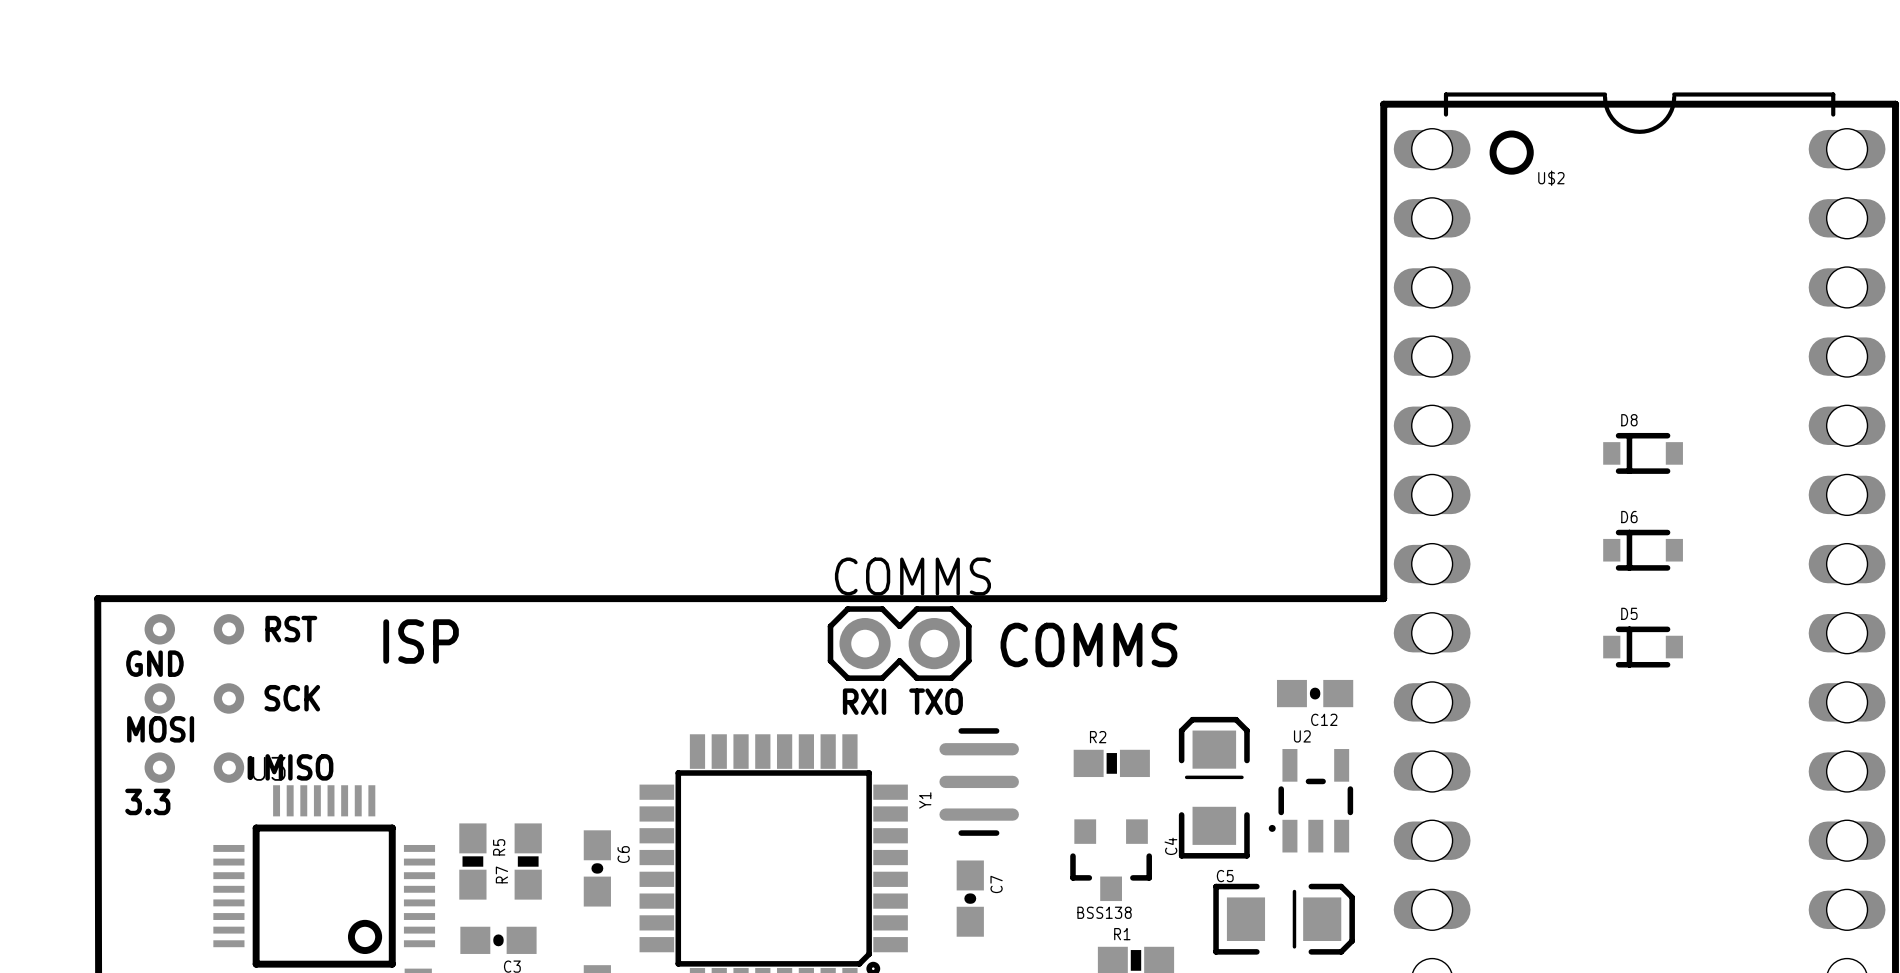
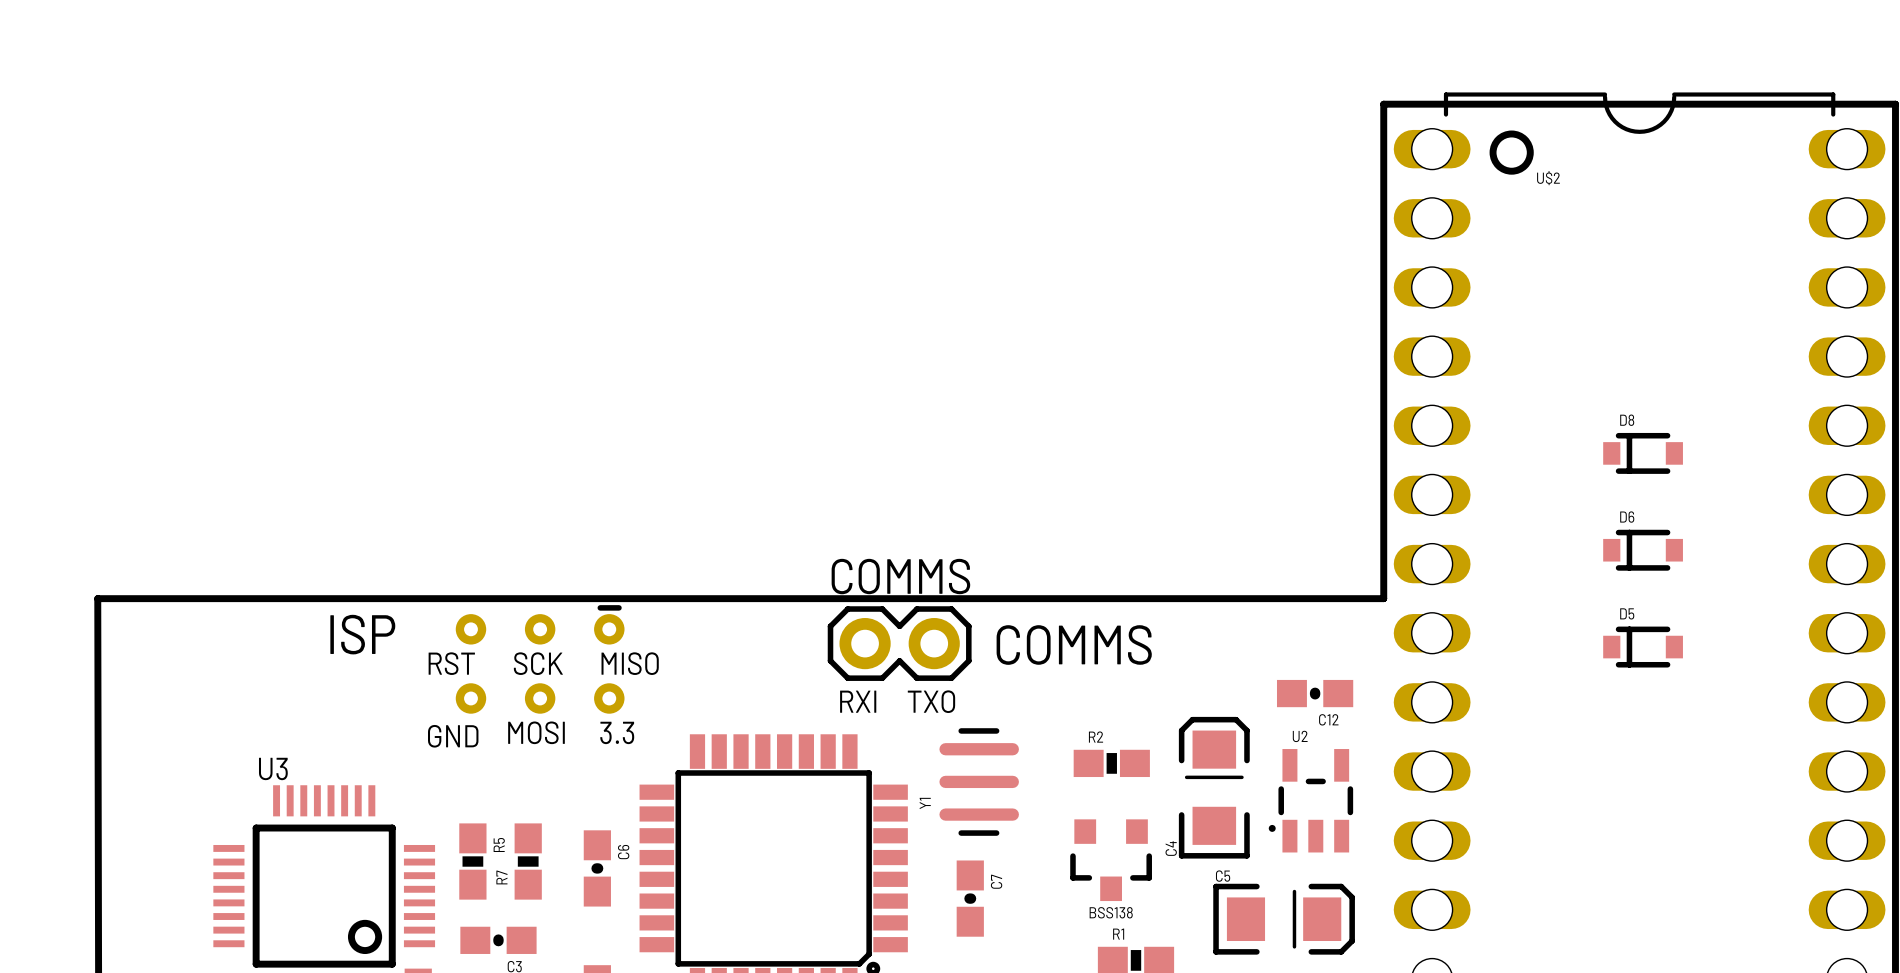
text position: RST (291, 629) -> RST (451, 663)
text position: ISP (421, 641) -> ISP (362, 634)
text position: GND (154, 663) -> GND (453, 736)
part rotation: 0° (198, 698) -> 90° counterclockwise (540, 659)
part position: (198, 698) -> (540, 659)
text position: SCK (292, 698) -> SCK (538, 663)
text position: MOSI (160, 729) -> MOSI (536, 732)
text position: MISO (299, 767) -> MISO (630, 663)
text position: 3.3 (147, 801) -> 3.3 (617, 732)

